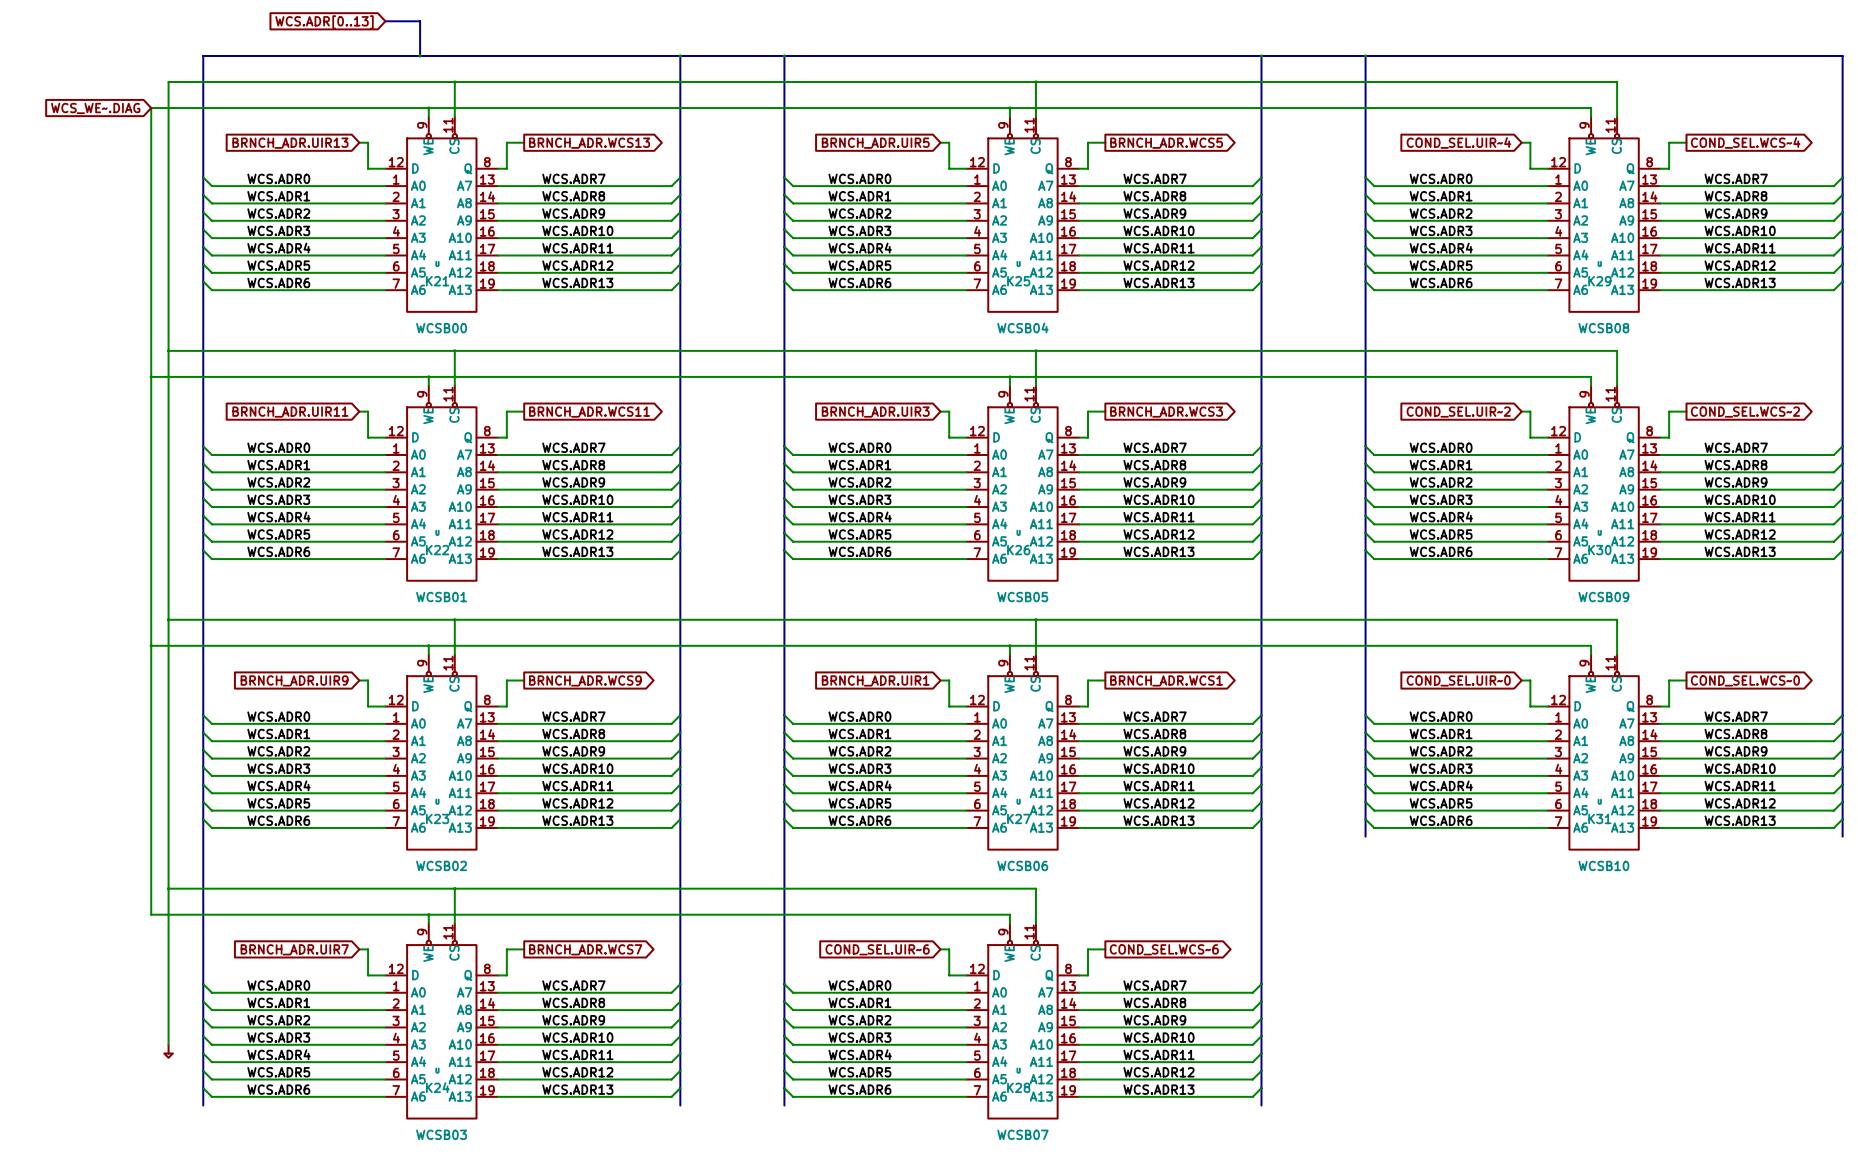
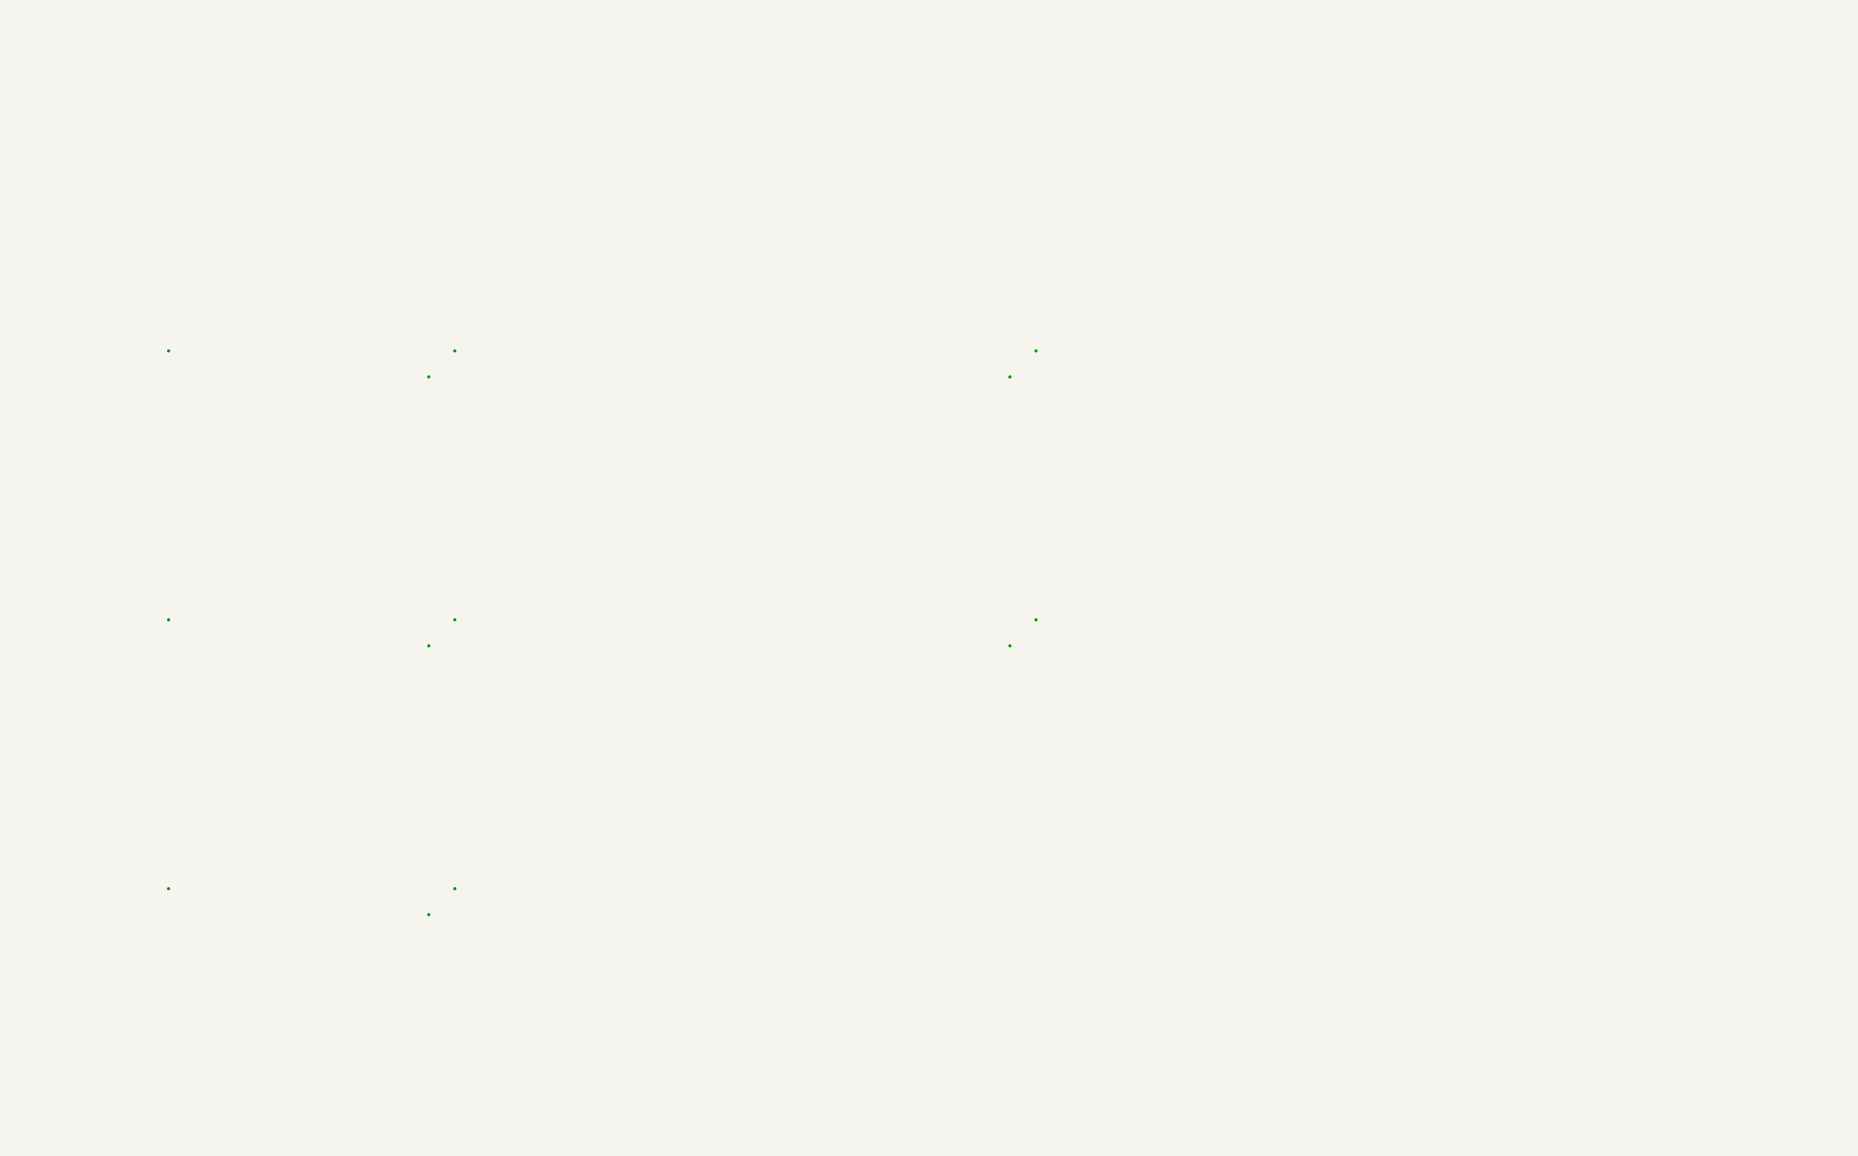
bus: (385, 21) (420, 21) (420, 55) -> none
global label: WCS.ADR[0..13] (324, 22) -> none
junction: (420, 55) -> none
bus: (680, 55) (680, 1105) -> none
junction: (680, 55) -> none
bus: (784, 55) (784, 1105) -> none
junction: (784, 55) -> none
bus: (1261, 55) (1261, 1105) -> none
junction: (1261, 55) -> none
bus: (1365, 55) (1365, 836) -> none
junction: (1365, 55) -> none
wire: (454, 82) (454, 116) -> none
wire: (1035, 82) (1035, 116) -> none
global label: WCS_WE~.DIAG (95, 108) -> none
wire: (428, 108) (428, 116) -> none
wire: (1009, 108) (1009, 116) -> none
wire: (1591, 116) (1591, 108) (151, 108) (151, 914) (1009, 914) (1009, 923) -> none
wire: (1617, 116) (1617, 82) (168, 82) (168, 1044) -> none
wire: (359, 142) (368, 142) (368, 168) (385, 168) -> none
wire: (524, 142) (506, 142) (506, 168) (498, 168) -> none
wire: (940, 142) (949, 142) (949, 168) (966, 168) -> none
wire: (1105, 142) (1088, 142) (1088, 168) (1079, 168) -> none
global label: COND_SEL.UIR~4 (1458, 142) -> none
wire: (1521, 142) (1530, 142) (1530, 168) (1547, 168) -> none
wire: (1686, 142) (1669, 142) (1669, 168) (1660, 168) -> none
global label: COND_SEL.WCS~4 (1745, 142) -> none
global label: BRNCH_ADR.UIR13 (290, 143) -> none
global label: BRNCH_ADR.WCS13 (589, 143) -> none
global label: BRNCH_ADR.UIR5 (875, 143) -> none
global label: BRNCH_ADR.WCS5 (1166, 143) -> none
wire: (203, 177) (211, 186) (385, 186) -> none
wire: (680, 177) (671, 186) (498, 186) -> none
wire: (784, 177) (793, 186) (966, 186) -> none
wire: (1261, 177) (1252, 186) (1079, 186) -> none
wire: (1365, 177) (1374, 186) (1547, 186) -> none
wire: (1842, 177) (1833, 186) (1660, 186) -> none
label: WCS.ADR0 (278, 178) -> none
label: WCS.ADR7 (573, 178) -> none
label: WCS.ADR0 (859, 178) -> none
label: WCS.ADR7 (1155, 178) -> none
label: WCS.ADR0 (1441, 178) -> none
label: WCS.ADR7 (1736, 178) -> none
wire: (203, 194) (211, 203) (385, 203) -> none
wire: (680, 194) (671, 203) (498, 203) -> none
wire: (784, 194) (793, 203) (966, 203) -> none
wire: (1261, 194) (1252, 203) (1079, 203) -> none
wire: (1365, 194) (1374, 203) (1547, 203) -> none
wire: (1842, 194) (1833, 203) (1660, 203) -> none
label: WCS.ADR1 (278, 196) -> none
label: WCS.ADR8 (573, 196) -> none
label: WCS.ADR1 (859, 196) -> none
label: WCS.ADR8 (1154, 196) -> none
label: WCS.ADR1 (1441, 196) -> none
label: WCS.ADR8 (1735, 196) -> none
wire: (203, 212) (211, 220) (385, 220) -> none
wire: (680, 212) (671, 220) (498, 220) -> none
wire: (784, 212) (793, 220) (966, 220) -> none
wire: (1261, 212) (1252, 220) (1079, 220) -> none
wire: (1365, 212) (1374, 220) (1547, 220) -> none
wire: (1842, 212) (1833, 220) (1660, 220) -> none
label: WCS.ADR2 (278, 213) -> none
label: WCS.ADR9 (573, 213) -> none
label: WCS.ADR2 (859, 213) -> none
label: WCS.ADR9 (1154, 213) -> none
label: WCS.ADR2 (1441, 213) -> none
label: WCS.ADR9 (1735, 213) -> none
part: (441, 214) -> none
part: (1022, 214) -> none
part: (1604, 214) -> none
wire: (203, 229) (211, 238) (385, 238) -> none
wire: (680, 229) (671, 238) (498, 238) -> none
wire: (784, 229) (793, 238) (966, 238) -> none
wire: (1261, 229) (1252, 238) (1079, 238) -> none
wire: (1365, 229) (1374, 238) (1547, 238) -> none
wire: (1842, 229) (1833, 238) (1660, 238) -> none
label: WCS.ADR3 (278, 230) -> none
label: WCS.ADR10 (577, 230) -> none
label: WCS.ADR3 (859, 230) -> none
label: WCS.ADR10 (1158, 230) -> none
label: WCS.ADR3 (1441, 230) -> none
label: WCS.ADR10 (1740, 230) -> none
wire: (203, 246) (211, 255) (385, 255) -> none
wire: (680, 246) (671, 255) (498, 255) -> none
wire: (784, 246) (793, 255) (966, 255) -> none
wire: (1261, 246) (1252, 255) (1079, 255) -> none
wire: (1365, 246) (1374, 255) (1547, 255) -> none
wire: (1842, 246) (1833, 255) (1660, 255) -> none
label: WCS.ADR4 (278, 248) -> none
label: WCS.ADR11 (577, 248) -> none
label: WCS.ADR4 (860, 248) -> none
label: WCS.ADR11 (1158, 248) -> none
label: WCS.ADR4 (1441, 248) -> none
label: WCS.ADR11 (1740, 248) -> none
wire: (203, 264) (211, 272) (385, 272) -> none
wire: (680, 264) (671, 272) (498, 272) -> none
wire: (784, 264) (793, 272) (966, 272) -> none
wire: (1261, 264) (1252, 272) (1079, 272) -> none
wire: (1365, 264) (1374, 272) (1547, 272) -> none
wire: (1842, 264) (1833, 272) (1660, 272) -> none
label: WCS.ADR5 (278, 265) -> none
label: WCS.ADR12 (577, 265) -> none
label: WCS.ADR5 (859, 265) -> none
label: WCS.ADR12 (1158, 265) -> none
label: WCS.ADR5 (1441, 265) -> none
label: WCS.ADR12 (1740, 265) -> none
wire: (203, 281) (211, 290) (385, 290) -> none
wire: (680, 281) (671, 290) (498, 290) -> none
wire: (784, 281) (793, 290) (966, 290) -> none
wire: (1261, 281) (1252, 290) (1079, 290) -> none
wire: (1365, 281) (1374, 290) (1547, 290) -> none
wire: (1842, 281) (1833, 290) (1660, 290) -> none
label: WCS.ADR6 (278, 282) -> none
label: WCS.ADR13 (577, 282) -> none
label: WCS.ADR6 (859, 282) -> none
label: WCS.ADR13 (1158, 282) -> none
label: WCS.ADR6 (1441, 282) -> none
label: WCS.ADR13 (1740, 282) -> none
wire: (168, 350) (1617, 350) (1617, 385) -> none
wire: (454, 350) (454, 385) -> none
wire: (1035, 350) (1035, 385) -> none
wire: (151, 376) (1591, 376) (1591, 385) -> none
wire: (428, 376) (428, 385) -> none
wire: (1009, 376) (1009, 385) -> none
wire: (359, 411) (368, 411) (368, 437) (385, 437) -> none
wire: (524, 411) (506, 411) (506, 437) (498, 437) -> none
wire: (940, 411) (949, 411) (949, 437) (966, 437) -> none
wire: (1105, 411) (1088, 411) (1088, 437) (1079, 437) -> none
wire: (1521, 411) (1530, 411) (1530, 437) (1547, 437) -> none
wire: (1686, 411) (1669, 411) (1669, 437) (1660, 437) -> none
global label: BRNCH_ADR.UIR11 (290, 412) -> none
global label: BRNCH_ADR.WCS11 (589, 412) -> none
global label: BRNCH_ADR.UIR3 (875, 412) -> none
global label: BRNCH_ADR.WCS3 (1166, 412) -> none
global label: COND_SEL.UIR~2 (1458, 412) -> none
global label: COND_SEL.WCS~2 (1745, 412) -> none
wire: (203, 446) (211, 454) (385, 454) -> none
wire: (680, 446) (671, 454) (498, 454) -> none
wire: (784, 446) (793, 454) (966, 454) -> none
wire: (1261, 446) (1252, 454) (1079, 454) -> none
wire: (1365, 446) (1374, 454) (1547, 454) -> none
wire: (1842, 446) (1833, 454) (1660, 454) -> none
label: WCS.ADR0 (278, 447) -> none
label: WCS.ADR7 (573, 447) -> none
label: WCS.ADR0 (859, 447) -> none
label: WCS.ADR7 (1155, 447) -> none
label: WCS.ADR0 (1441, 447) -> none
label: WCS.ADR7 (1736, 447) -> none
wire: (203, 463) (211, 472) (385, 472) -> none
wire: (680, 463) (671, 472) (498, 472) -> none
wire: (784, 463) (793, 472) (966, 472) -> none
wire: (1261, 463) (1252, 472) (1079, 472) -> none
wire: (1365, 463) (1374, 472) (1547, 472) -> none
wire: (1842, 463) (1833, 472) (1660, 472) -> none
label: WCS.ADR1 (278, 465) -> none
label: WCS.ADR8 (573, 465) -> none
label: WCS.ADR1 (859, 465) -> none
label: WCS.ADR8 (1154, 465) -> none
label: WCS.ADR1 (1441, 465) -> none
label: WCS.ADR8 (1735, 465) -> none
wire: (203, 481) (211, 489) (385, 489) -> none
wire: (680, 481) (671, 489) (498, 489) -> none
wire: (784, 481) (793, 489) (966, 489) -> none
wire: (1261, 481) (1252, 489) (1079, 489) -> none
wire: (1365, 481) (1374, 489) (1547, 489) -> none
wire: (1842, 481) (1833, 489) (1660, 489) -> none
label: WCS.ADR2 (278, 482) -> none
label: WCS.ADR9 (573, 482) -> none
label: WCS.ADR2 (859, 482) -> none
label: WCS.ADR9 (1154, 482) -> none
label: WCS.ADR2 (1441, 482) -> none
label: WCS.ADR9 (1735, 482) -> none
part: (441, 483) -> none
part: (1022, 483) -> none
part: (1604, 483) -> none
wire: (203, 498) (211, 507) (385, 507) -> none
wire: (680, 498) (671, 507) (498, 507) -> none
wire: (784, 498) (793, 507) (966, 507) -> none
wire: (1261, 498) (1252, 507) (1079, 507) -> none
wire: (1365, 498) (1374, 507) (1547, 507) -> none
wire: (1842, 498) (1833, 507) (1660, 507) -> none
label: WCS.ADR3 (278, 499) -> none
label: WCS.ADR10 (577, 499) -> none
label: WCS.ADR3 (859, 499) -> none
label: WCS.ADR10 (1158, 499) -> none
label: WCS.ADR3 (1441, 499) -> none
label: WCS.ADR10 (1740, 499) -> none
wire: (203, 515) (211, 524) (385, 524) -> none
wire: (680, 515) (671, 524) (498, 524) -> none
wire: (784, 515) (793, 524) (966, 524) -> none
wire: (1261, 515) (1252, 524) (1079, 524) -> none
wire: (1365, 515) (1374, 524) (1547, 524) -> none
wire: (1842, 515) (1833, 524) (1660, 524) -> none
label: WCS.ADR4 (278, 516) -> none
label: WCS.ADR4 (860, 516) -> none
label: WCS.ADR4 (1441, 516) -> none
label: WCS.ADR11 (577, 517) -> none
label: WCS.ADR11 (1158, 517) -> none
label: WCS.ADR11 (1740, 517) -> none
wire: (203, 533) (211, 541) (385, 541) -> none
wire: (680, 533) (671, 541) (498, 541) -> none
wire: (784, 533) (793, 541) (966, 541) -> none
wire: (1261, 533) (1252, 541) (1079, 541) -> none
wire: (1365, 533) (1374, 541) (1547, 541) -> none
wire: (1842, 533) (1833, 541) (1660, 541) -> none
label: WCS.ADR5 (278, 534) -> none
label: WCS.ADR12 (577, 534) -> none
label: WCS.ADR5 (859, 534) -> none
label: WCS.ADR12 (1158, 534) -> none
label: WCS.ADR5 (1441, 534) -> none
label: WCS.ADR12 (1740, 534) -> none
wire: (203, 550) (211, 559) (385, 559) -> none
wire: (680, 550) (671, 559) (498, 559) -> none
wire: (784, 550) (793, 559) (966, 559) -> none
wire: (1261, 550) (1252, 559) (1079, 559) -> none
wire: (1365, 550) (1374, 559) (1547, 559) -> none
wire: (1842, 550) (1833, 559) (1660, 559) -> none
label: WCS.ADR6 (278, 551) -> none
label: WCS.ADR13 (577, 551) -> none
label: WCS.ADR6 (859, 551) -> none
label: WCS.ADR13 (1158, 551) -> none
label: WCS.ADR6 (1441, 551) -> none
label: WCS.ADR13 (1740, 551) -> none
wire: (168, 619) (1617, 619) (1617, 654) -> none
wire: (454, 619) (454, 654) -> none
wire: (1035, 619) (1035, 654) -> none
wire: (151, 645) (1591, 645) (1591, 654) -> none
wire: (428, 645) (428, 654) -> none
wire: (1009, 645) (1009, 654) -> none
global label: BRNCH_ADR.UIR9 (294, 680) -> none
wire: (359, 680) (368, 680) (368, 706) (385, 706) -> none
wire: (524, 680) (506, 680) (506, 706) (498, 706) -> none
global label: BRNCH_ADR.WCS9 (585, 680) -> none
global label: BRNCH_ADR.UIR1 (875, 680) -> none
wire: (940, 680) (949, 680) (949, 706) (966, 706) -> none
wire: (1105, 680) (1088, 680) (1088, 706) (1079, 706) -> none
global label: BRNCH_ADR.WCS1 (1166, 680) -> none
global label: COND_SEL.UIR~0 (1458, 680) -> none
wire: (1521, 680) (1530, 680) (1530, 706) (1547, 706) -> none
wire: (1686, 680) (1669, 680) (1669, 706) (1660, 706) -> none
global label: COND_SEL.WCS~0 (1745, 680) -> none
wire: (203, 715) (211, 723) (385, 723) -> none
wire: (680, 715) (671, 723) (498, 723) -> none
wire: (784, 715) (793, 723) (966, 723) -> none
wire: (1261, 715) (1252, 723) (1079, 723) -> none
wire: (1365, 715) (1374, 723) (1547, 723) -> none
wire: (1842, 715) (1833, 723) (1660, 723) -> none
label: WCS.ADR0 (278, 716) -> none
label: WCS.ADR7 (573, 716) -> none
label: WCS.ADR0 (859, 716) -> none
label: WCS.ADR7 (1155, 716) -> none
label: WCS.ADR0 (1441, 716) -> none
label: WCS.ADR7 (1736, 716) -> none
wire: (203, 732) (211, 741) (385, 741) -> none
wire: (680, 732) (671, 741) (498, 741) -> none
wire: (784, 732) (793, 741) (966, 741) -> none
wire: (1261, 732) (1252, 741) (1079, 741) -> none
wire: (1365, 732) (1374, 741) (1547, 741) -> none
wire: (1842, 732) (1833, 741) (1660, 741) -> none
label: WCS.ADR1 (278, 734) -> none
label: WCS.ADR8 (573, 734) -> none
label: WCS.ADR1 (859, 734) -> none
label: WCS.ADR8 (1154, 734) -> none
label: WCS.ADR1 (1441, 734) -> none
label: WCS.ADR8 (1735, 734) -> none
wire: (203, 749) (211, 758) (385, 758) -> none
wire: (680, 749) (671, 758) (498, 758) -> none
wire: (784, 749) (793, 758) (966, 758) -> none
wire: (1261, 749) (1252, 758) (1079, 758) -> none
wire: (1365, 749) (1374, 758) (1547, 758) -> none
wire: (1842, 749) (1833, 758) (1660, 758) -> none
label: WCS.ADR2 (278, 751) -> none
label: WCS.ADR9 (573, 751) -> none
label: WCS.ADR2 (859, 751) -> none
label: WCS.ADR9 (1154, 751) -> none
label: WCS.ADR2 (1441, 751) -> none
label: WCS.ADR9 (1735, 751) -> none
part: (441, 752) -> none
part: (1022, 752) -> none
part: (1604, 752) -> none
wire: (203, 767) (211, 775) (385, 775) -> none
wire: (680, 767) (671, 775) (498, 775) -> none
wire: (784, 767) (793, 775) (966, 775) -> none
wire: (1261, 767) (1252, 775) (1079, 775) -> none
wire: (1365, 767) (1374, 775) (1547, 775) -> none
wire: (1842, 767) (1833, 775) (1660, 775) -> none
label: WCS.ADR3 (278, 768) -> none
label: WCS.ADR10 (577, 768) -> none
label: WCS.ADR3 (859, 768) -> none
label: WCS.ADR10 (1158, 768) -> none
label: WCS.ADR3 (1441, 768) -> none
label: WCS.ADR10 (1740, 768) -> none
wire: (203, 784) (211, 793) (385, 793) -> none
wire: (680, 784) (671, 793) (498, 793) -> none
wire: (784, 784) (793, 793) (966, 793) -> none
wire: (1261, 784) (1252, 793) (1079, 793) -> none
wire: (1365, 784) (1374, 793) (1547, 793) -> none
wire: (1842, 784) (1833, 793) (1660, 793) -> none
label: WCS.ADR4 (278, 785) -> none
label: WCS.ADR4 (860, 785) -> none
label: WCS.ADR4 (1441, 785) -> none
label: WCS.ADR11 (577, 786) -> none
label: WCS.ADR11 (1158, 786) -> none
label: WCS.ADR11 (1740, 786) -> none
wire: (203, 801) (211, 810) (385, 810) -> none
wire: (680, 801) (671, 810) (498, 810) -> none
wire: (784, 801) (793, 810) (966, 810) -> none
wire: (1261, 801) (1252, 810) (1079, 810) -> none
wire: (1365, 801) (1374, 810) (1547, 810) -> none
wire: (1842, 801) (1833, 810) (1660, 810) -> none
label: WCS.ADR5 (278, 803) -> none
label: WCS.ADR12 (577, 803) -> none
label: WCS.ADR5 (859, 803) -> none
label: WCS.ADR12 (1158, 803) -> none
label: WCS.ADR5 (1441, 803) -> none
label: WCS.ADR12 (1740, 803) -> none
wire: (203, 819) (211, 827) (385, 827) -> none
wire: (680, 819) (671, 827) (498, 827) -> none
wire: (784, 819) (793, 827) (966, 827) -> none
wire: (1261, 819) (1252, 827) (1079, 827) -> none
wire: (1365, 819) (1374, 827) (1547, 827) -> none
wire: (1842, 819) (1833, 827) (1660, 827) -> none
label: WCS.ADR6 (278, 820) -> none
label: WCS.ADR13 (577, 820) -> none
label: WCS.ADR6 (859, 820) -> none
label: WCS.ADR13 (1158, 820) -> none
label: WCS.ADR6 (1441, 820) -> none
label: WCS.ADR13 (1740, 820) -> none
bus: (1842, 836) (1842, 55) (203, 55) (203, 1105) -> none
wire: (168, 888) (1035, 888) (1035, 923) -> none
wire: (454, 888) (454, 923) -> none
wire: (428, 914) (428, 923) -> none
global label: BRNCH_ADR.UIR7 (294, 949) -> none
wire: (359, 949) (368, 949) (368, 975) (385, 975) -> none
wire: (524, 949) (506, 949) (506, 975) (498, 975) -> none
global label: BRNCH_ADR.WCS7 (585, 949) -> none
global label: COND_SEL.UIR~6 (877, 949) -> none
wire: (940, 949) (949, 949) (949, 975) (966, 975) -> none
wire: (1105, 949) (1088, 949) (1088, 975) (1079, 975) -> none
global label: COND_SEL.WCS~6 (1164, 949) -> none
wire: (203, 984) (211, 992) (385, 992) -> none
wire: (680, 984) (671, 992) (498, 992) -> none
wire: (784, 984) (793, 992) (966, 992) -> none
wire: (1261, 984) (1252, 992) (1079, 992) -> none
label: WCS.ADR0 (278, 985) -> none
label: WCS.ADR7 (573, 985) -> none
label: WCS.ADR0 (859, 985) -> none
label: WCS.ADR7 (1155, 985) -> none
wire: (203, 1001) (211, 1010) (385, 1010) -> none
wire: (680, 1001) (671, 1010) (498, 1010) -> none
wire: (784, 1001) (793, 1010) (966, 1010) -> none
wire: (1261, 1001) (1252, 1010) (1079, 1010) -> none
label: WCS.ADR1 (278, 1002) -> none
label: WCS.ADR8 (573, 1002) -> none
label: WCS.ADR1 (859, 1002) -> none
label: WCS.ADR8 (1154, 1002) -> none
wire: (203, 1018) (211, 1027) (385, 1027) -> none
wire: (680, 1018) (671, 1027) (498, 1027) -> none
wire: (784, 1018) (793, 1027) (966, 1027) -> none
wire: (1261, 1018) (1252, 1027) (1079, 1027) -> none
label: WCS.ADR2 (278, 1020) -> none
part: (441, 1020) -> none
label: WCS.ADR9 (573, 1020) -> none
label: WCS.ADR2 (859, 1020) -> none
part: (1022, 1020) -> none
label: WCS.ADR9 (1154, 1020) -> none
wire: (203, 1036) (211, 1044) (385, 1044) -> none
wire: (680, 1036) (671, 1044) (498, 1044) -> none
wire: (784, 1036) (793, 1044) (966, 1044) -> none
wire: (1261, 1036) (1252, 1044) (1079, 1044) -> none
label: WCS.ADR3 (278, 1037) -> none
label: WCS.ADR10 (577, 1037) -> none
label: WCS.ADR3 (859, 1037) -> none
label: WCS.ADR10 (1158, 1037) -> none
power symbol: (168, 1051) -> none
wire: (203, 1053) (211, 1062) (385, 1062) -> none
wire: (680, 1053) (671, 1062) (498, 1062) -> none
wire: (784, 1053) (793, 1062) (966, 1062) -> none
wire: (1261, 1053) (1252, 1062) (1079, 1062) -> none
label: WCS.ADR4 (278, 1054) -> none
label: WCS.ADR11 (577, 1054) -> none
label: WCS.ADR4 (860, 1054) -> none
label: WCS.ADR11 (1158, 1054) -> none
wire: (203, 1070) (211, 1079) (385, 1079) -> none
wire: (680, 1070) (671, 1079) (498, 1079) -> none
wire: (784, 1070) (793, 1079) (966, 1079) -> none
wire: (1261, 1070) (1252, 1079) (1079, 1079) -> none
label: WCS.ADR5 (278, 1072) -> none
label: WCS.ADR12 (577, 1072) -> none
label: WCS.ADR5 (859, 1072) -> none
label: WCS.ADR12 (1158, 1072) -> none
wire: (203, 1088) (211, 1096) (385, 1096) -> none
wire: (680, 1088) (671, 1096) (498, 1096) -> none
wire: (784, 1088) (793, 1096) (966, 1096) -> none
wire: (1261, 1088) (1252, 1096) (1079, 1096) -> none
label: WCS.ADR6 (278, 1089) -> none
label: WCS.ADR13 (577, 1089) -> none
label: WCS.ADR6 (859, 1089) -> none
label: WCS.ADR13 (1158, 1089) -> none

